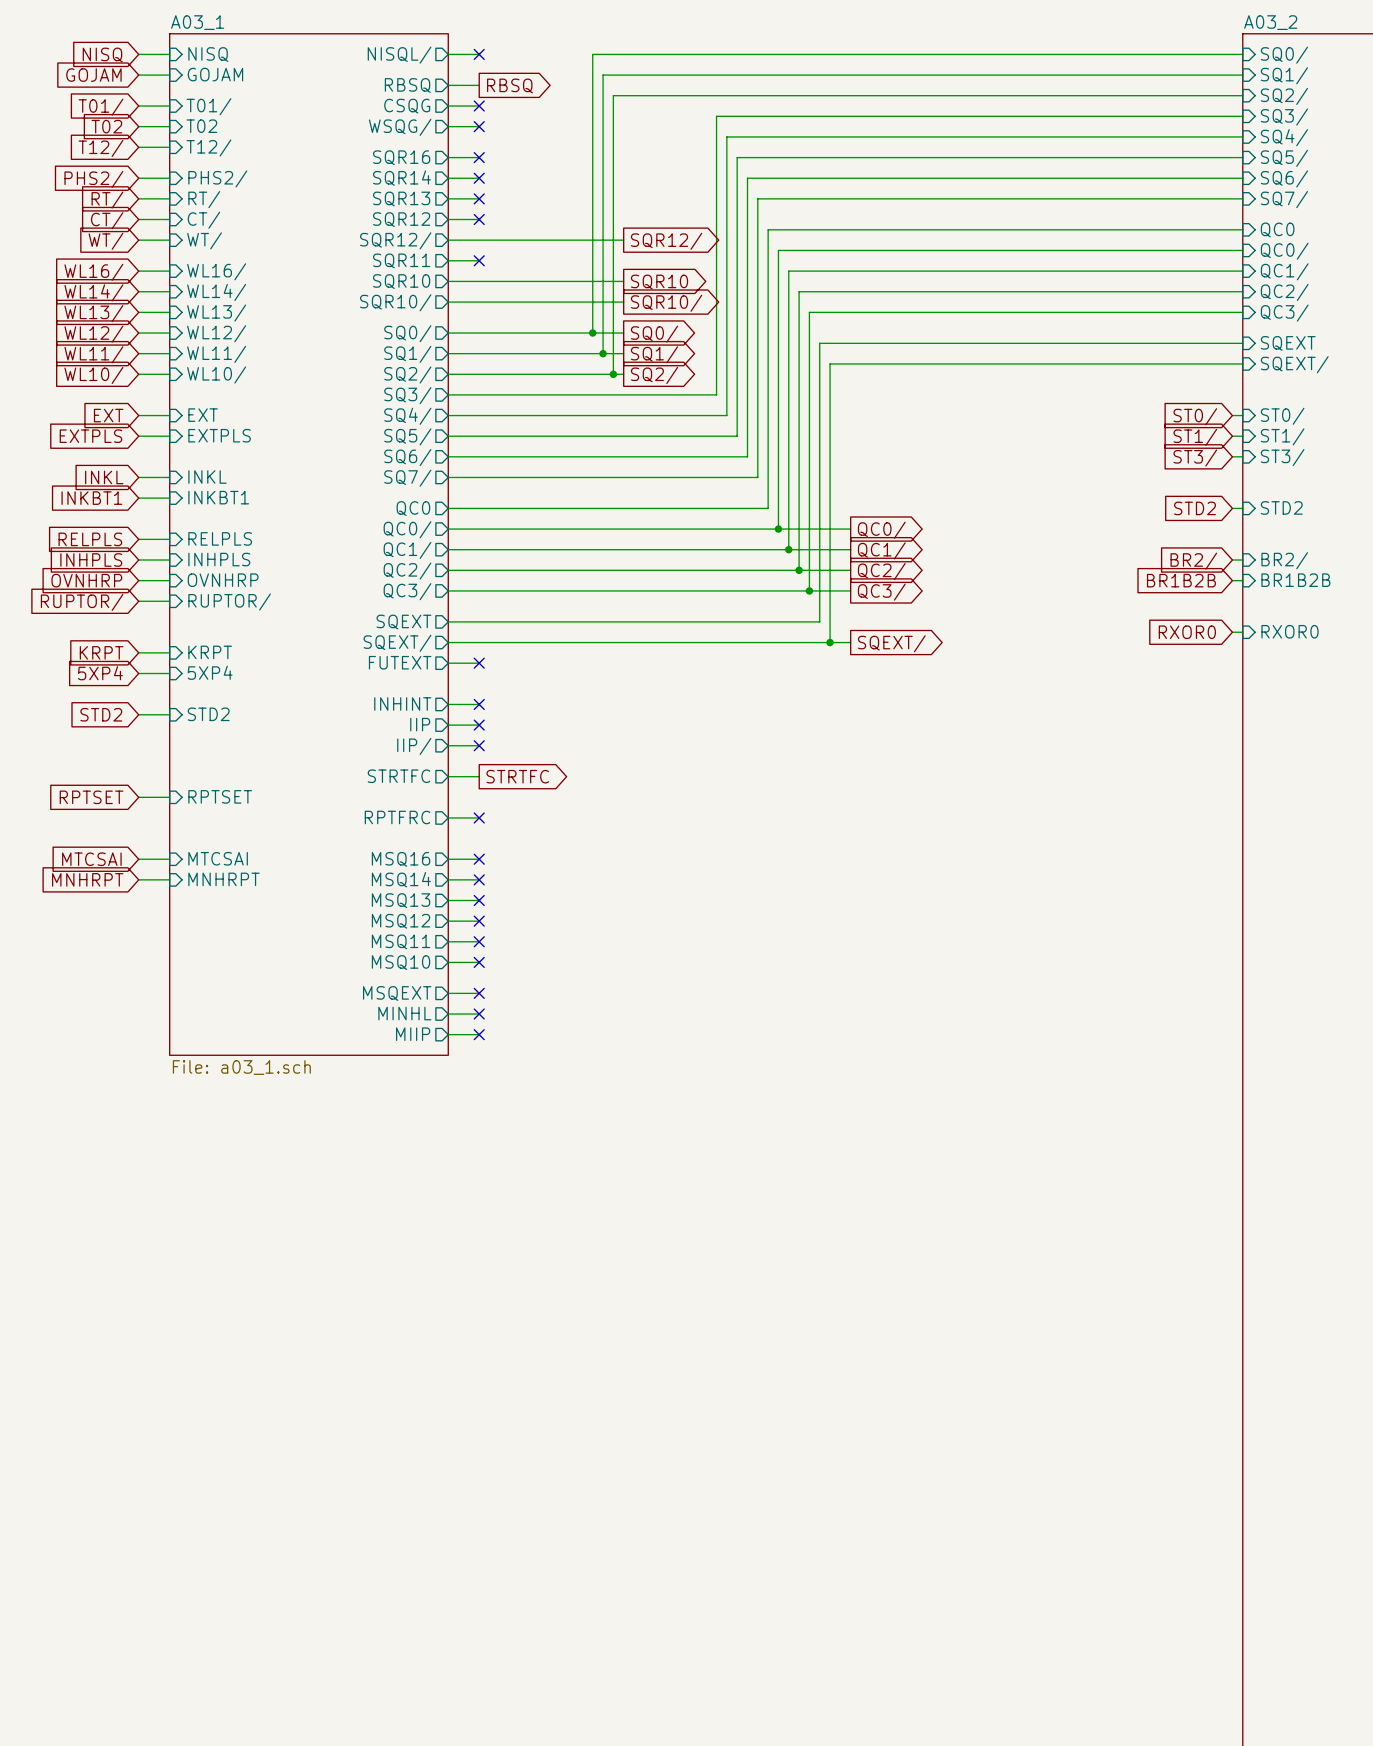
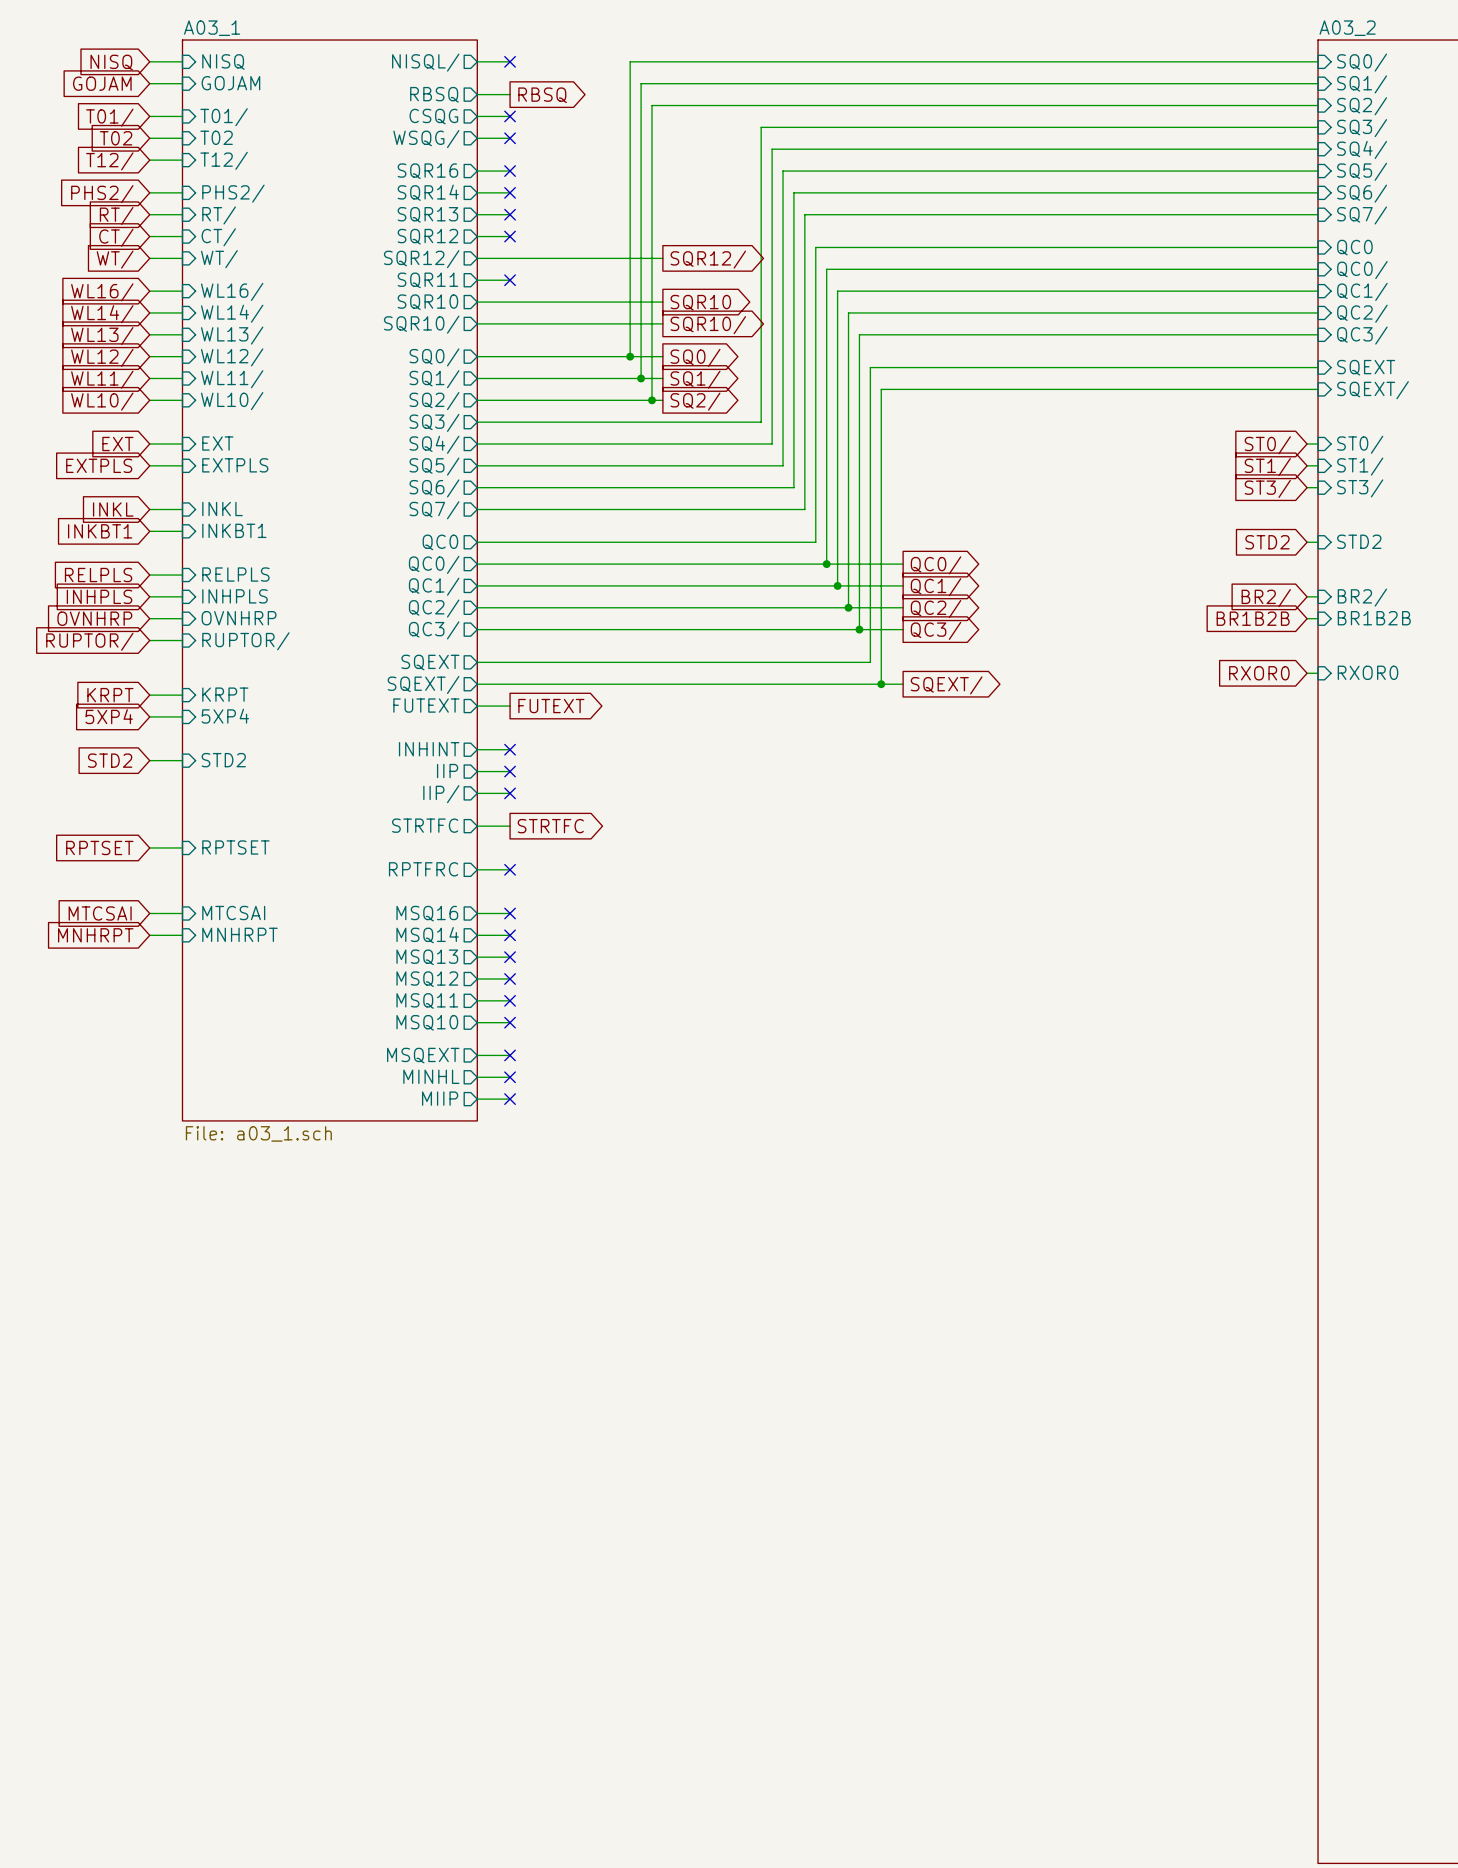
no-connect mark: (479, 663) -> none
global label: none -> FUTEXT (551, 706)

